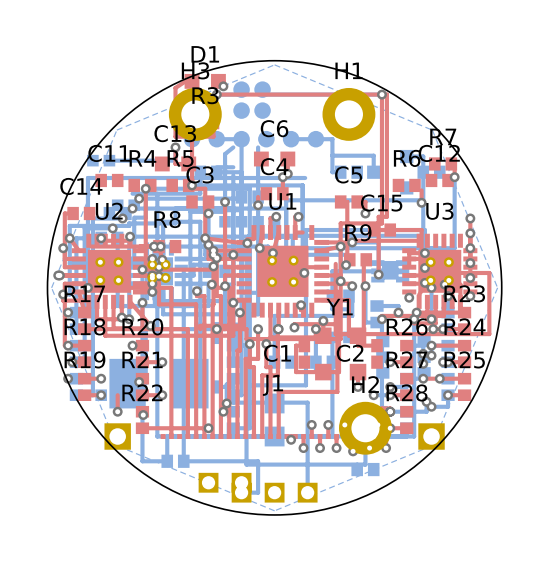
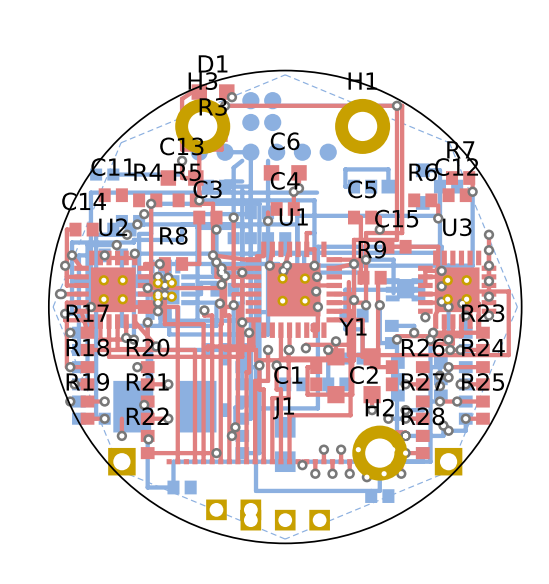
bottom track: (299, 139) (332, 139) (332, 155) -> none
bottom track: (200, 178) (200, 193) (132, 193) -> none
bottom track: (157, 193) (157, 436) (167, 436) -> none
top track: none -> (199, 217) (199, 263) (182, 263)
via: (276, 216) -> none
via: (298, 216) -> none
top track: (378, 216) (378, 274) -> (393, 233) (366, 233) (366, 300)
top track: (276, 218) (270, 218) (270, 225) -> none
top track: none -> (314, 249) (314, 265)
top track: (347, 240) (416, 240) -> none
via: (247, 243) -> none
bottom track: (163, 244) (163, 221) (200, 221) (200, 386) -> none
top track: (91, 246) (139, 246) -> none
via: (160, 246) -> none
via: none -> (286, 265)
via: none -> (314, 265)
via: none -> (317, 276)
via: (346, 265) -> none
bottom track: (183, 267) (183, 461) (258, 461) (258, 492) (251, 492) -> none
via: (378, 274) -> none
bottom track: (352, 286) (352, 315) (274, 315) (274, 362) -> none
top track: none -> (317, 306) (317, 330)
via position: (301, 305) -> (317, 306)
via: (216, 329) -> none
bottom track: (332, 337) (332, 436) -> none
bottom track: (222, 386) (233, 386) (233, 402) (307, 402) (307, 492) -> none

